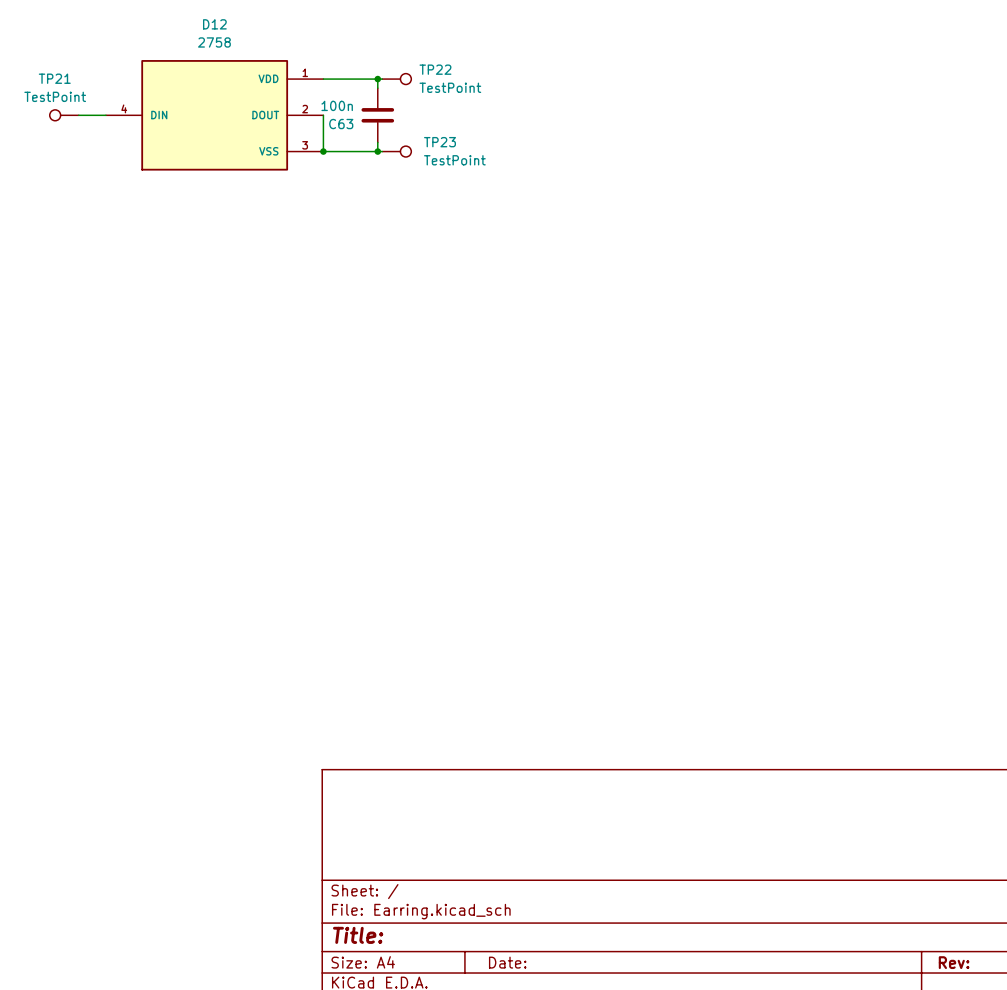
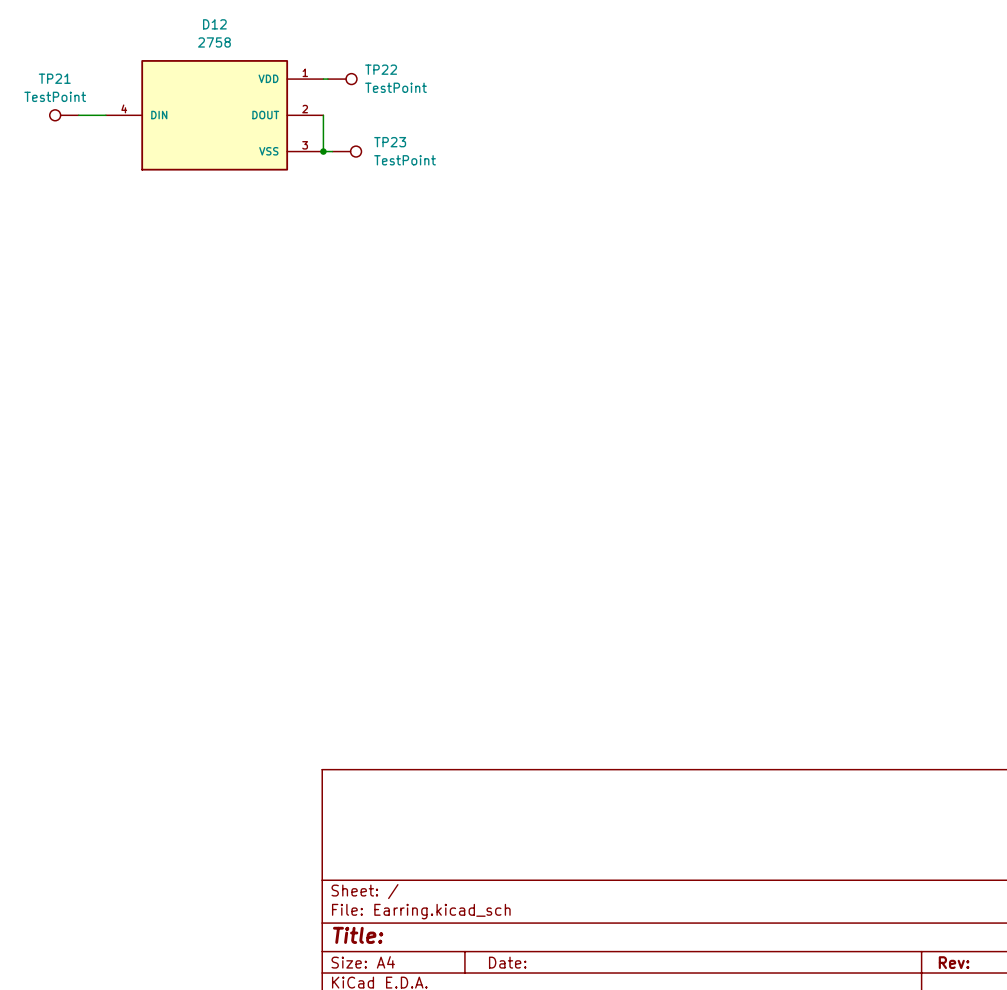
wire: (327, 79) (382, 79) -> none
wire: (377, 79) (377, 88) -> none
junction: (377, 79) -> none
TP22 position: (396, 79) -> (342, 79)
C63: 100n (377, 115) -> none
wire: (377, 142) (377, 151) -> none
wire: (332, 151) (382, 151) -> none
junction: (377, 151) -> none
TP23 position: (396, 151) -> (346, 151)

